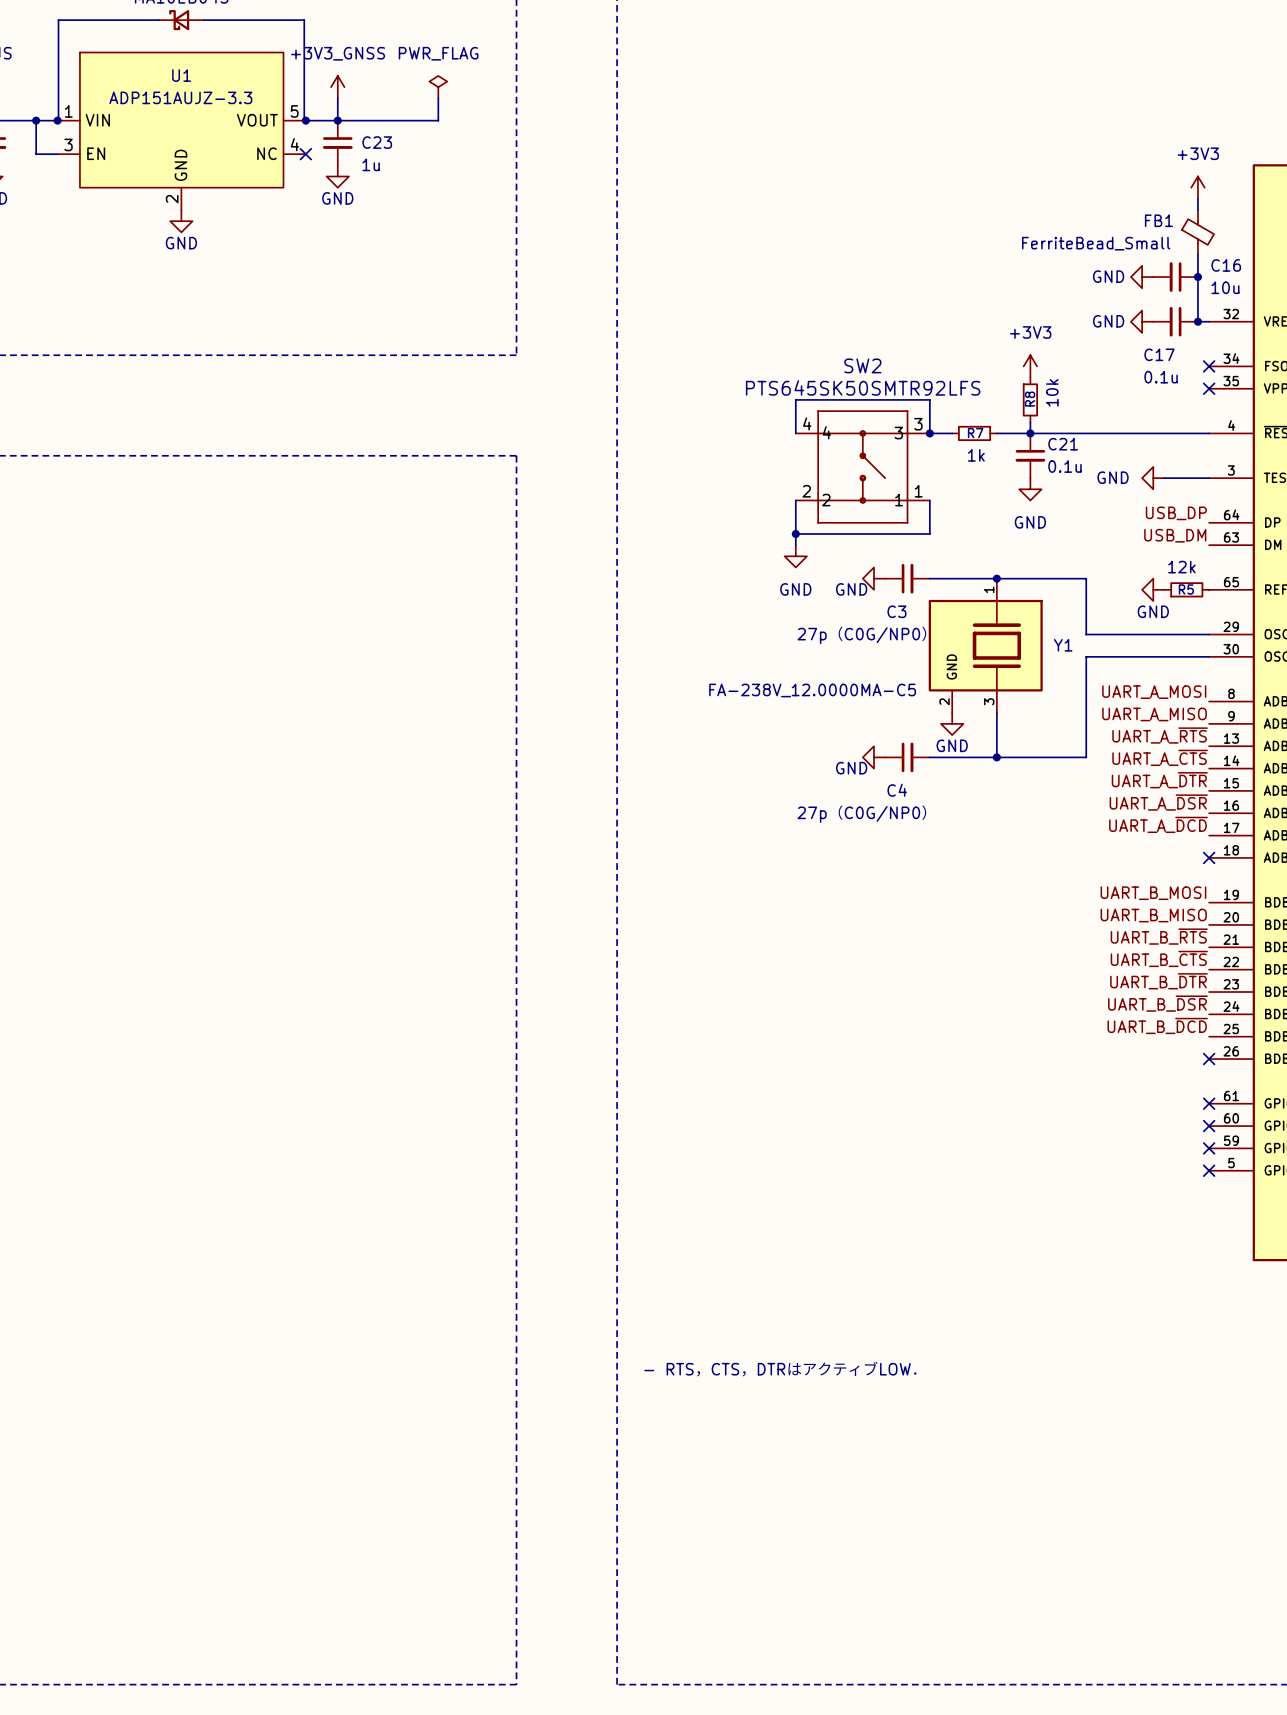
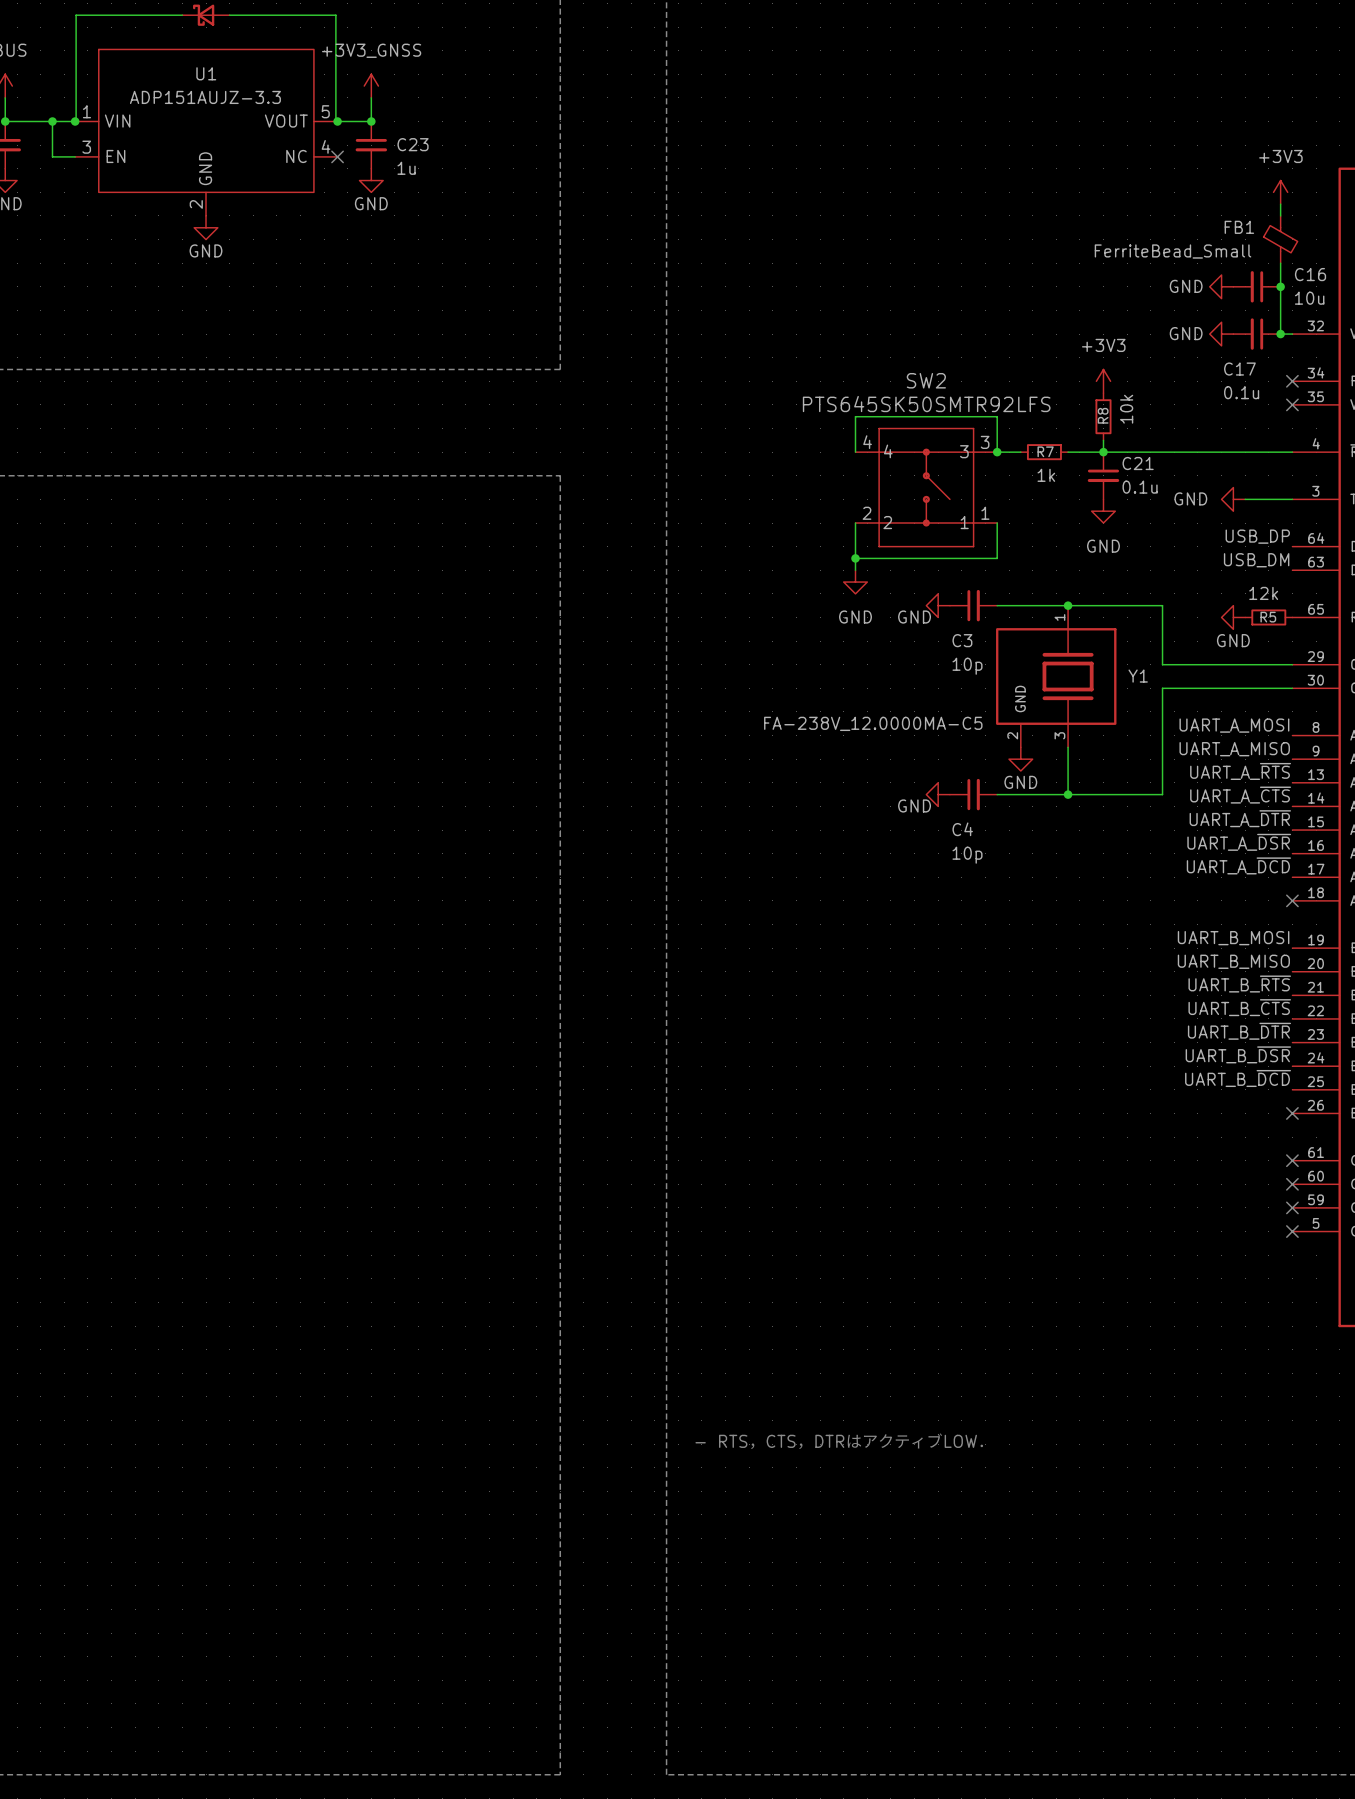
power symbol: PWR_FLAG (438, 87) -> none
wire: (438, 98) (438, 120) (337, 120) -> none
C3 value: 27p（C0G/NP0） (862, 635) -> 10p (967, 666)
C4 value: 27p（C0G/NP0） (862, 813) -> 10p (967, 855)

